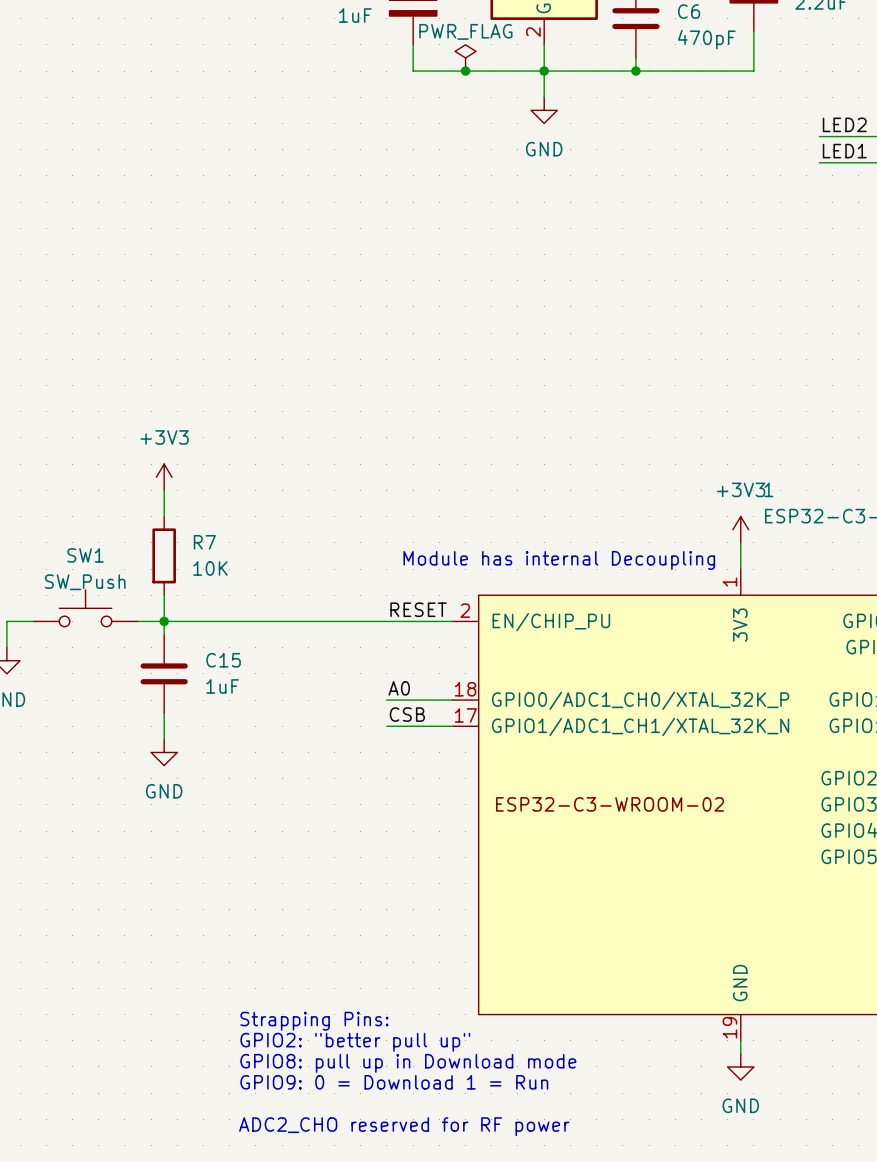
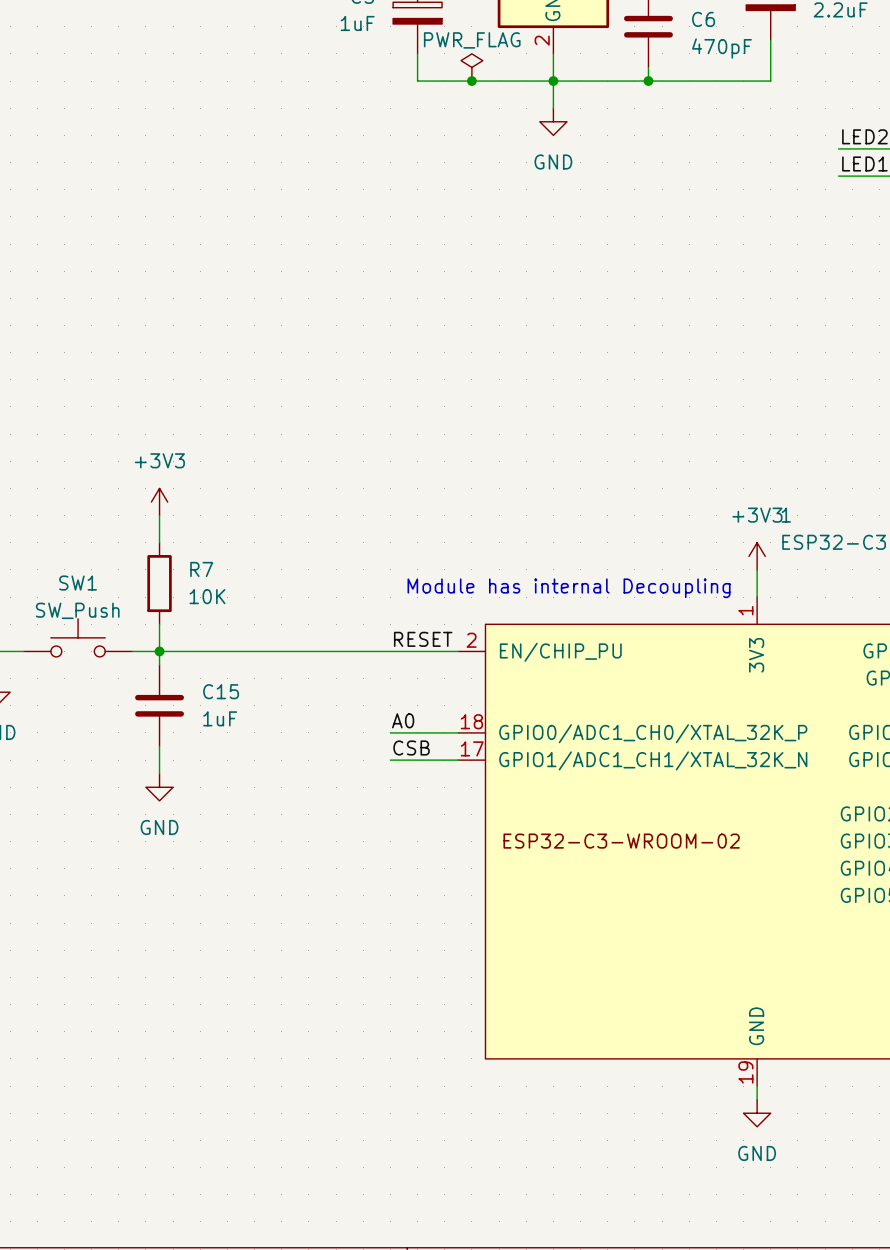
text: Strapping Pins: (314, 1021) -> none
text: GPIO2: "better pull up" (355, 1042) -> none
text: GPIO8: pull up in Download mode (408, 1063) -> none
text: GPIO9: 0 = Download 1 = Run (394, 1082) -> none
text: ADC2_CHO reserved for RF power (404, 1126) -> none

